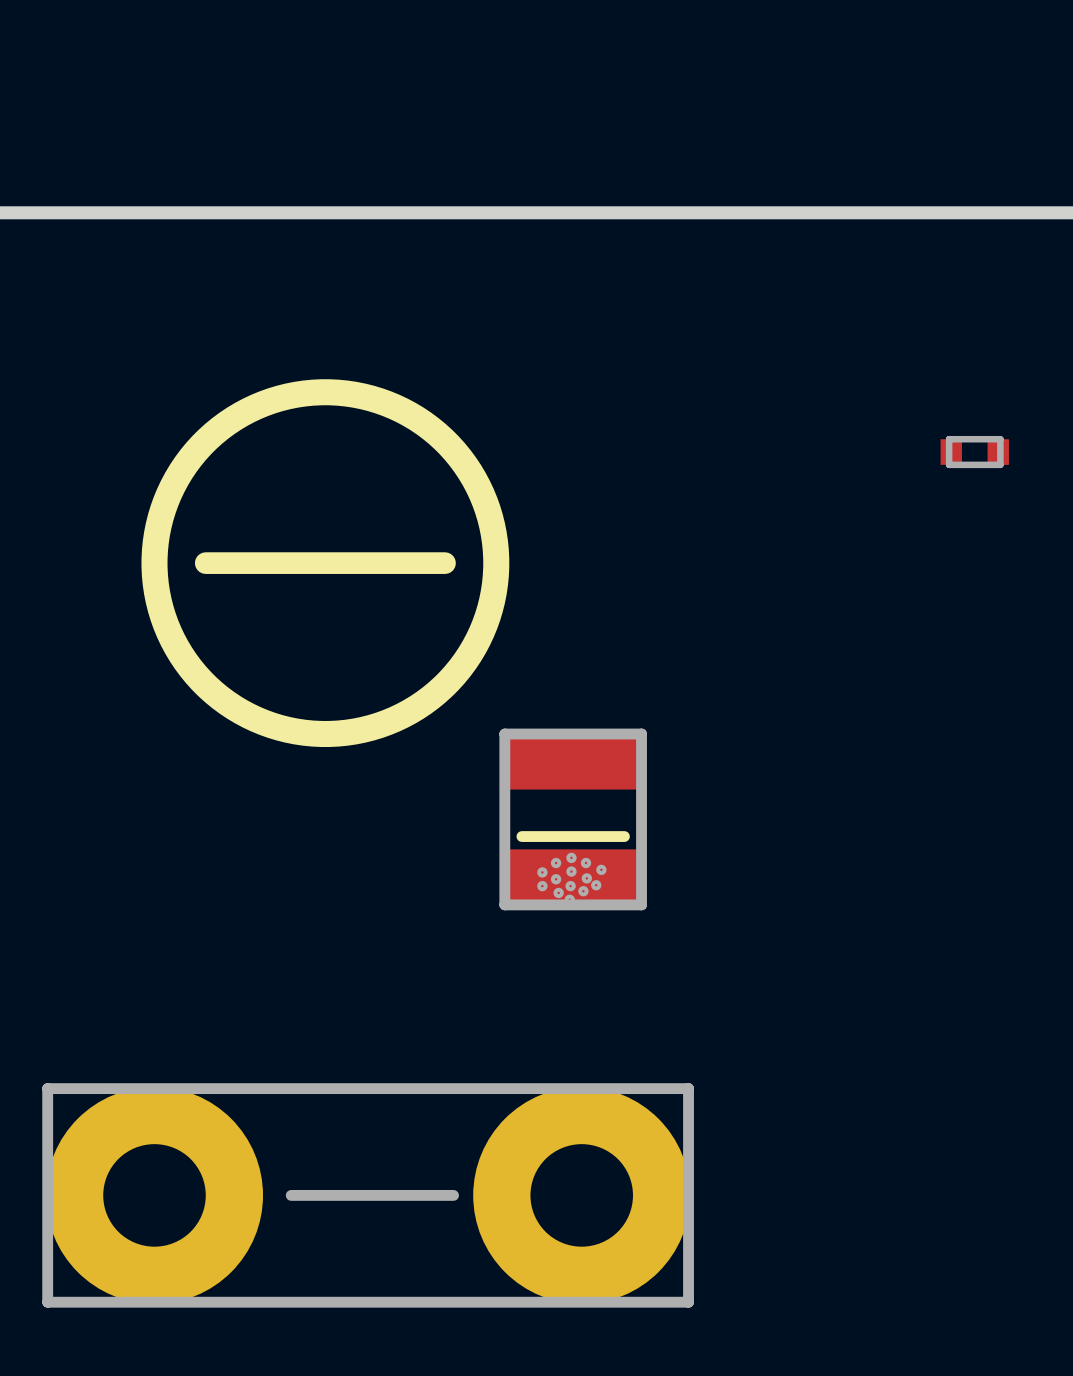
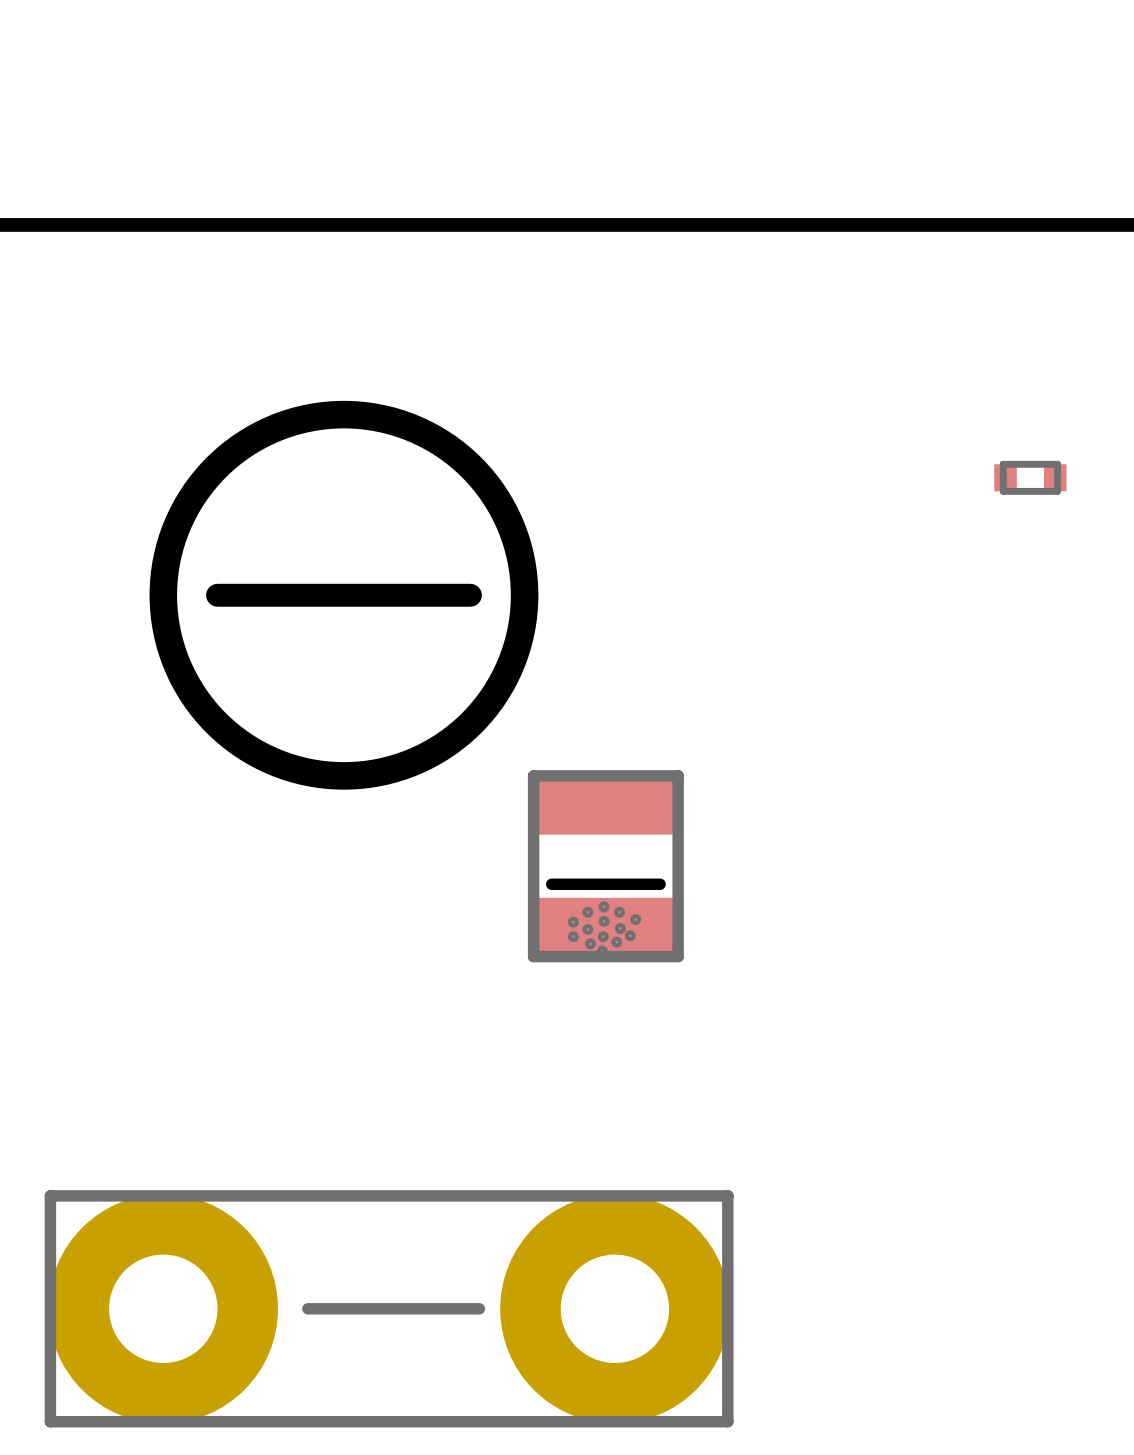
part position: (368, 1195) -> (389, 1308)

